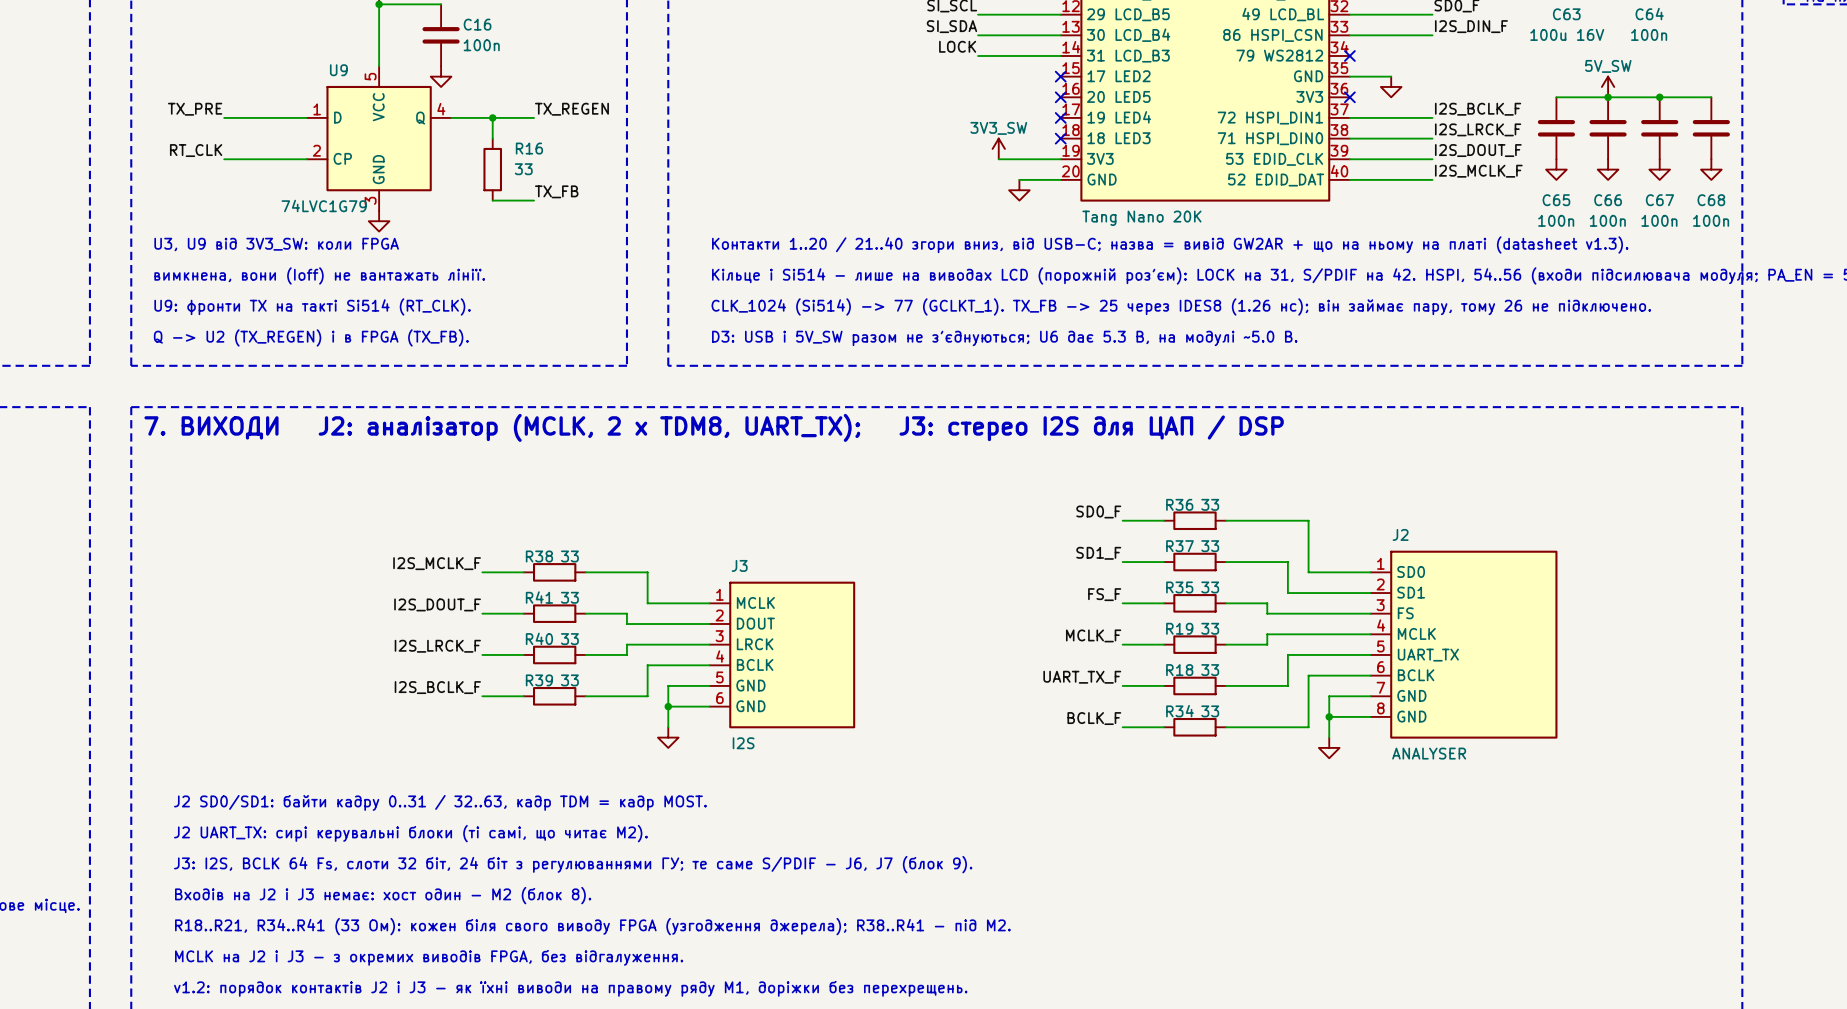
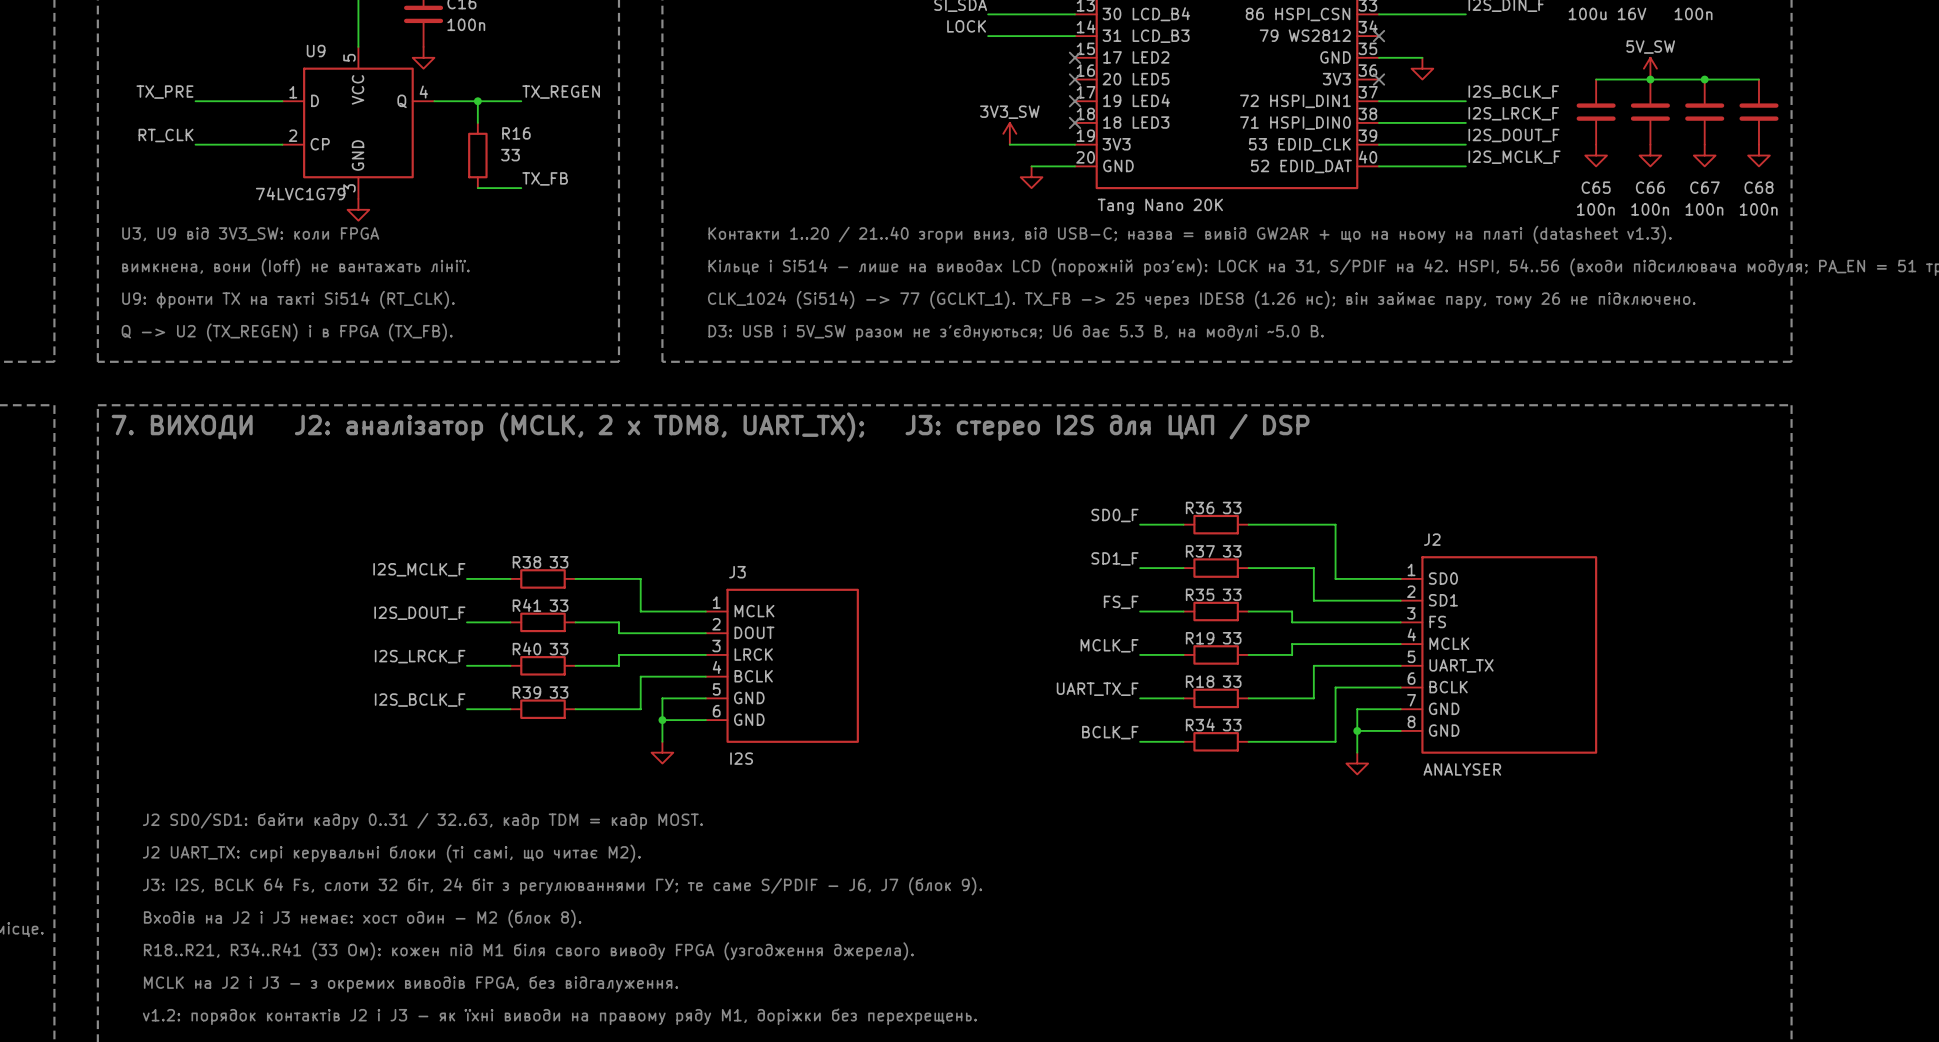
text: R18..R21, R34..R41 (33 Ом): кожен біля свого виводу FPGA (узгодження джерела); R38..R41 - під M2. (592, 926) -> R18..R21, R34..R41 (33 Ом): кожен під M1 біля свого виводу FPGA (узгодження джерела). (528, 951)

